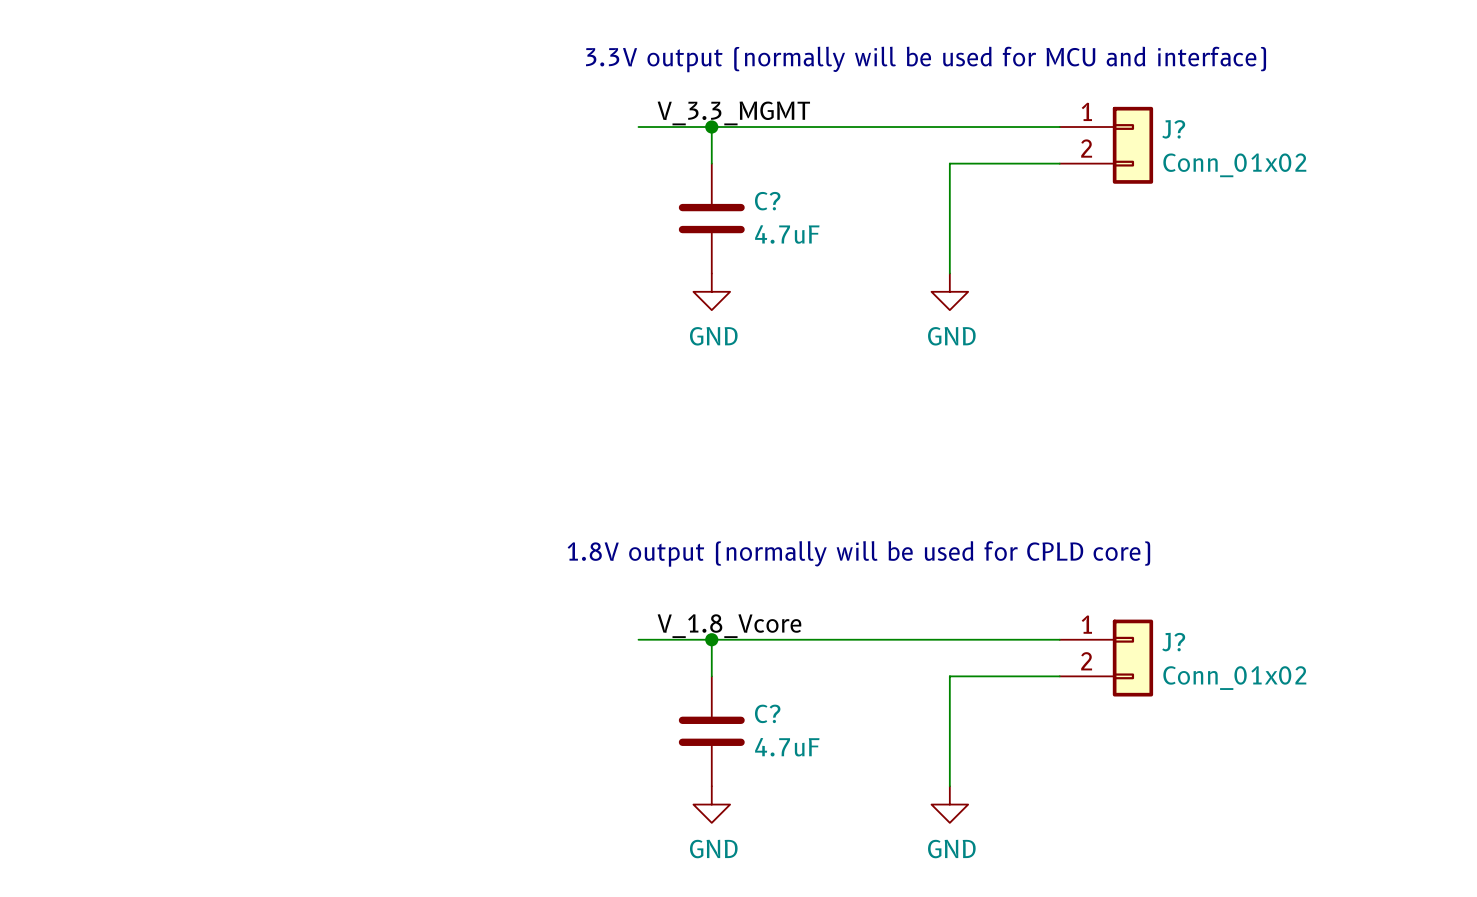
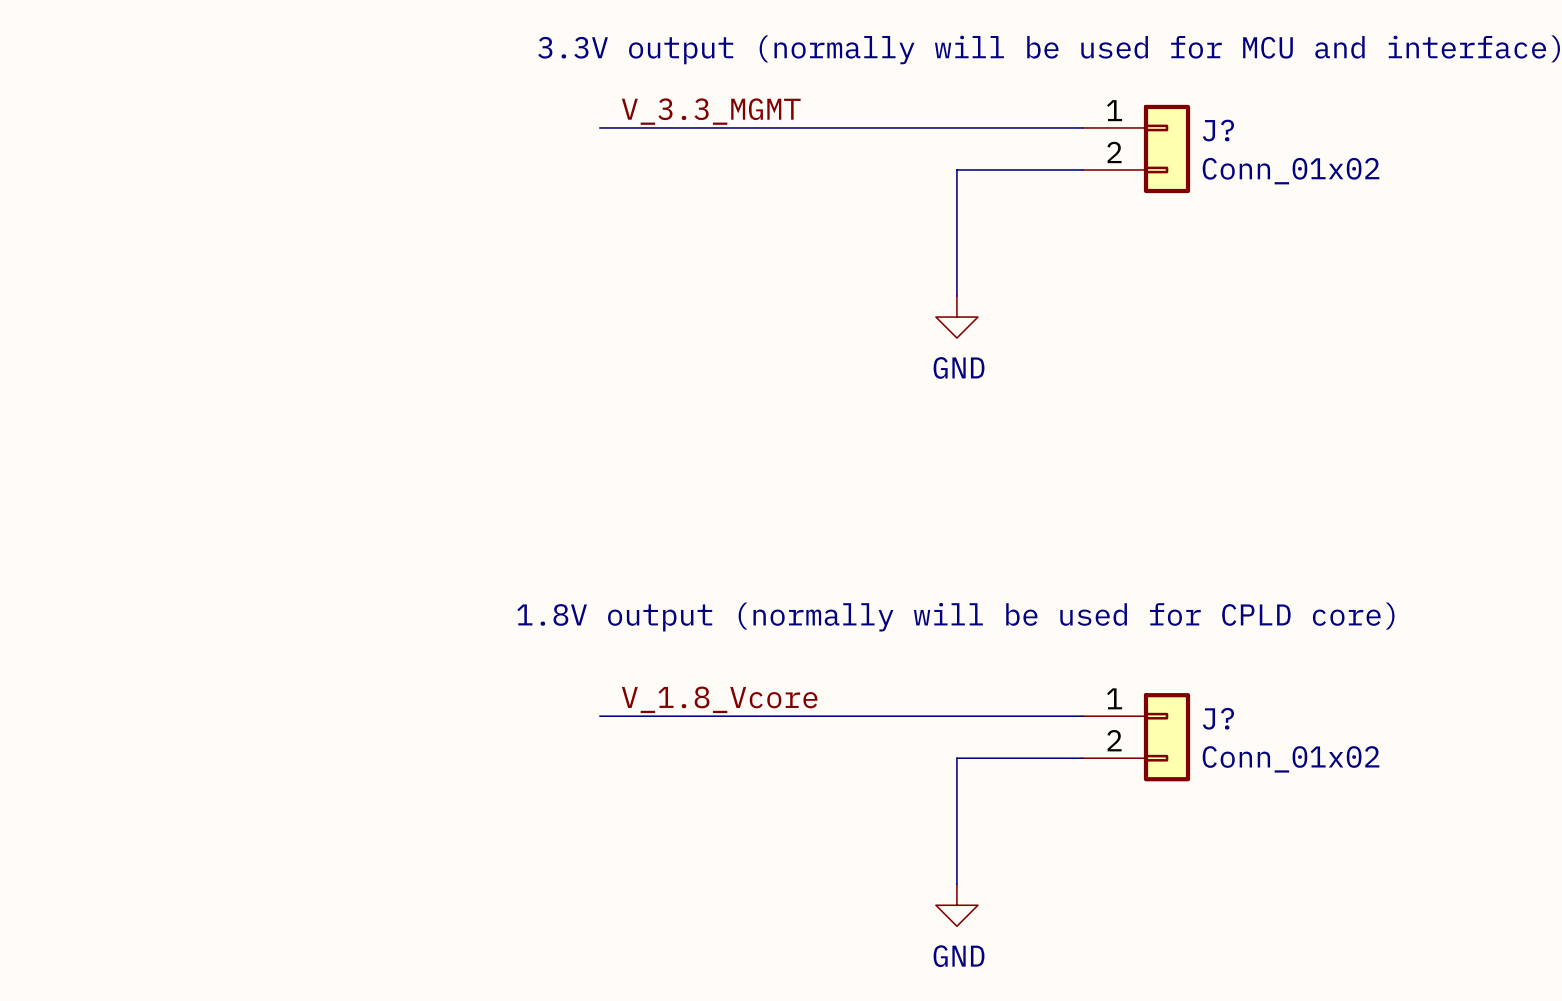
wire: (711, 127) (711, 163) -> none
junction: (711, 127) -> none
C?: 4.7uF (711, 218) -> none
power symbol: GND (711, 291) -> none
wire: (711, 639) (711, 676) -> none
junction: (711, 639) -> none
C?: 4.7uF (711, 731) -> none
power symbol: GND (711, 804) -> none

